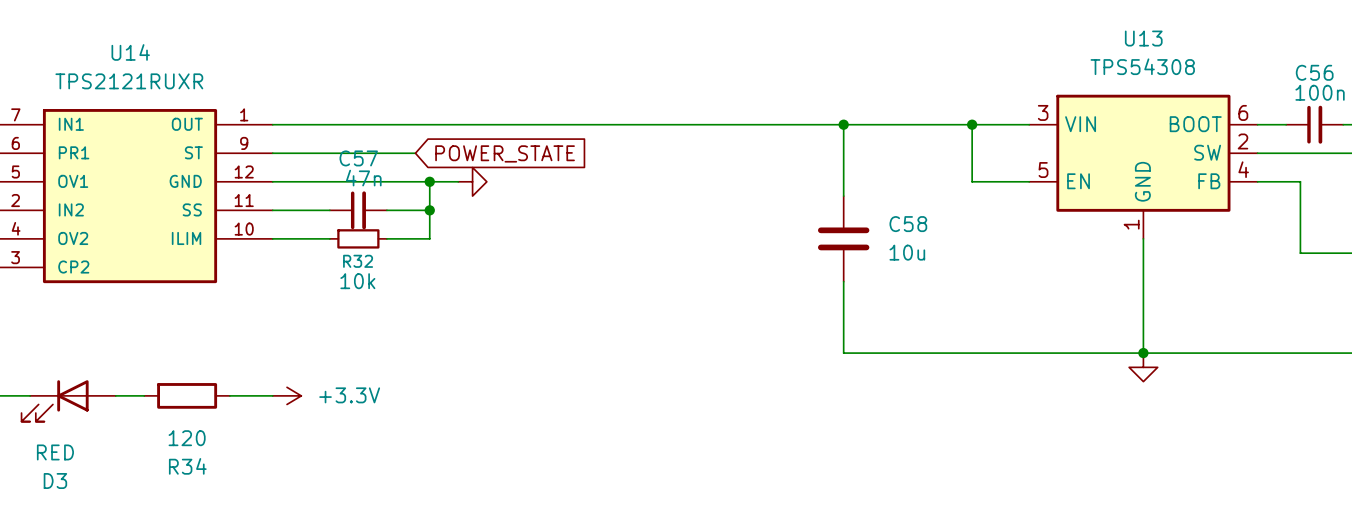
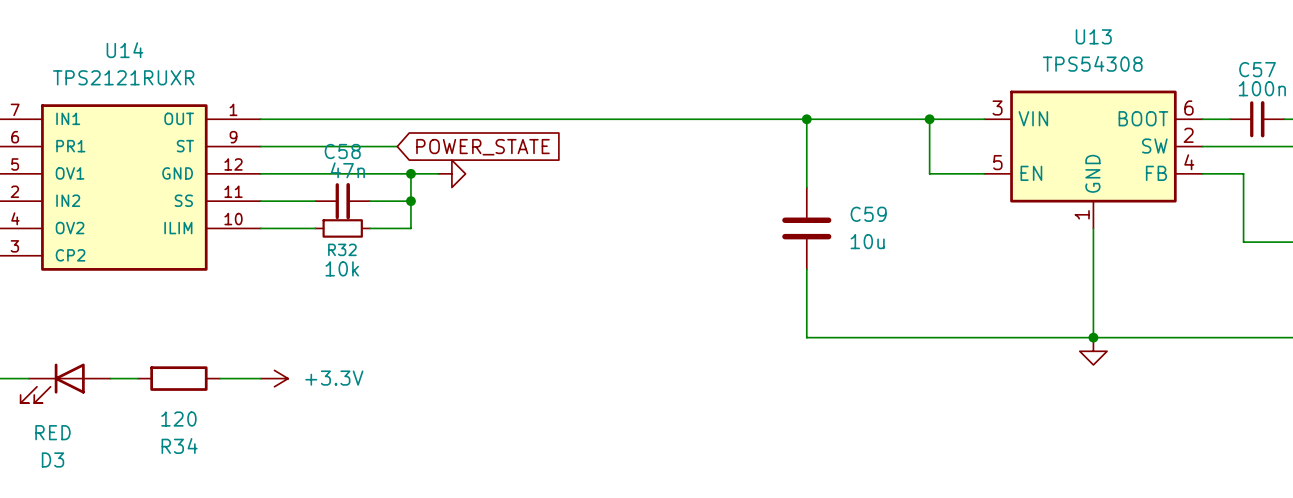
C56 name: C56 (1314, 72) -> C57 (1257, 69)
C57 name: C57 (358, 158) -> C58 (342, 151)
C58 name: C58 (908, 224) -> C59 (868, 214)

